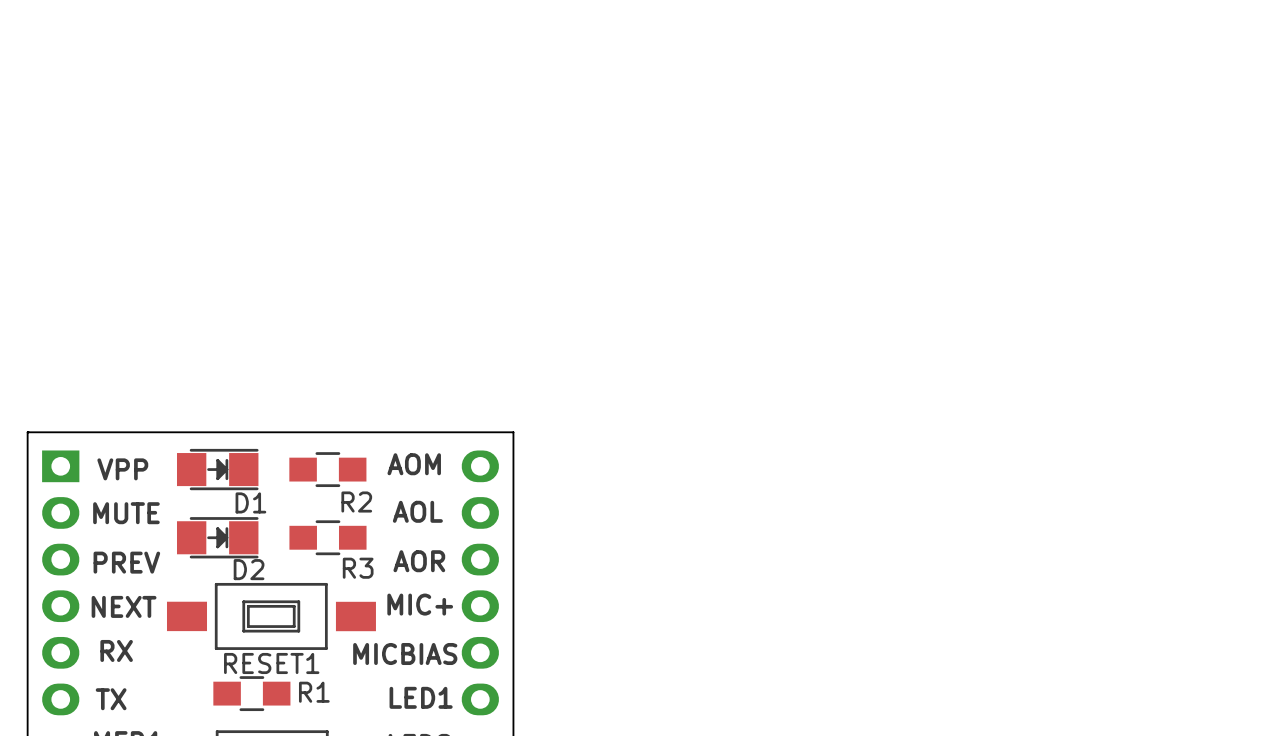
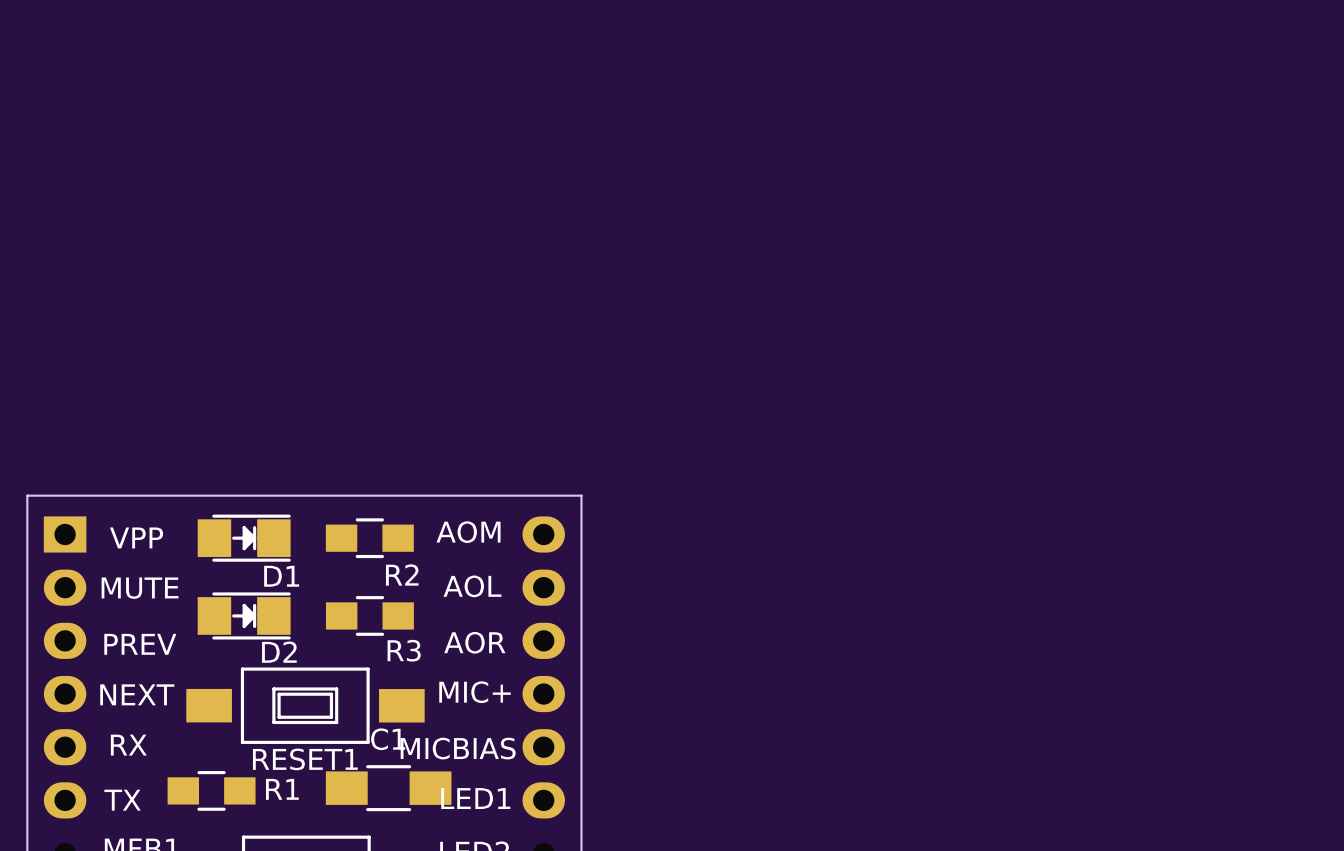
C1: none -> (388, 788)
R1 position: (251, 693) -> (211, 790)

